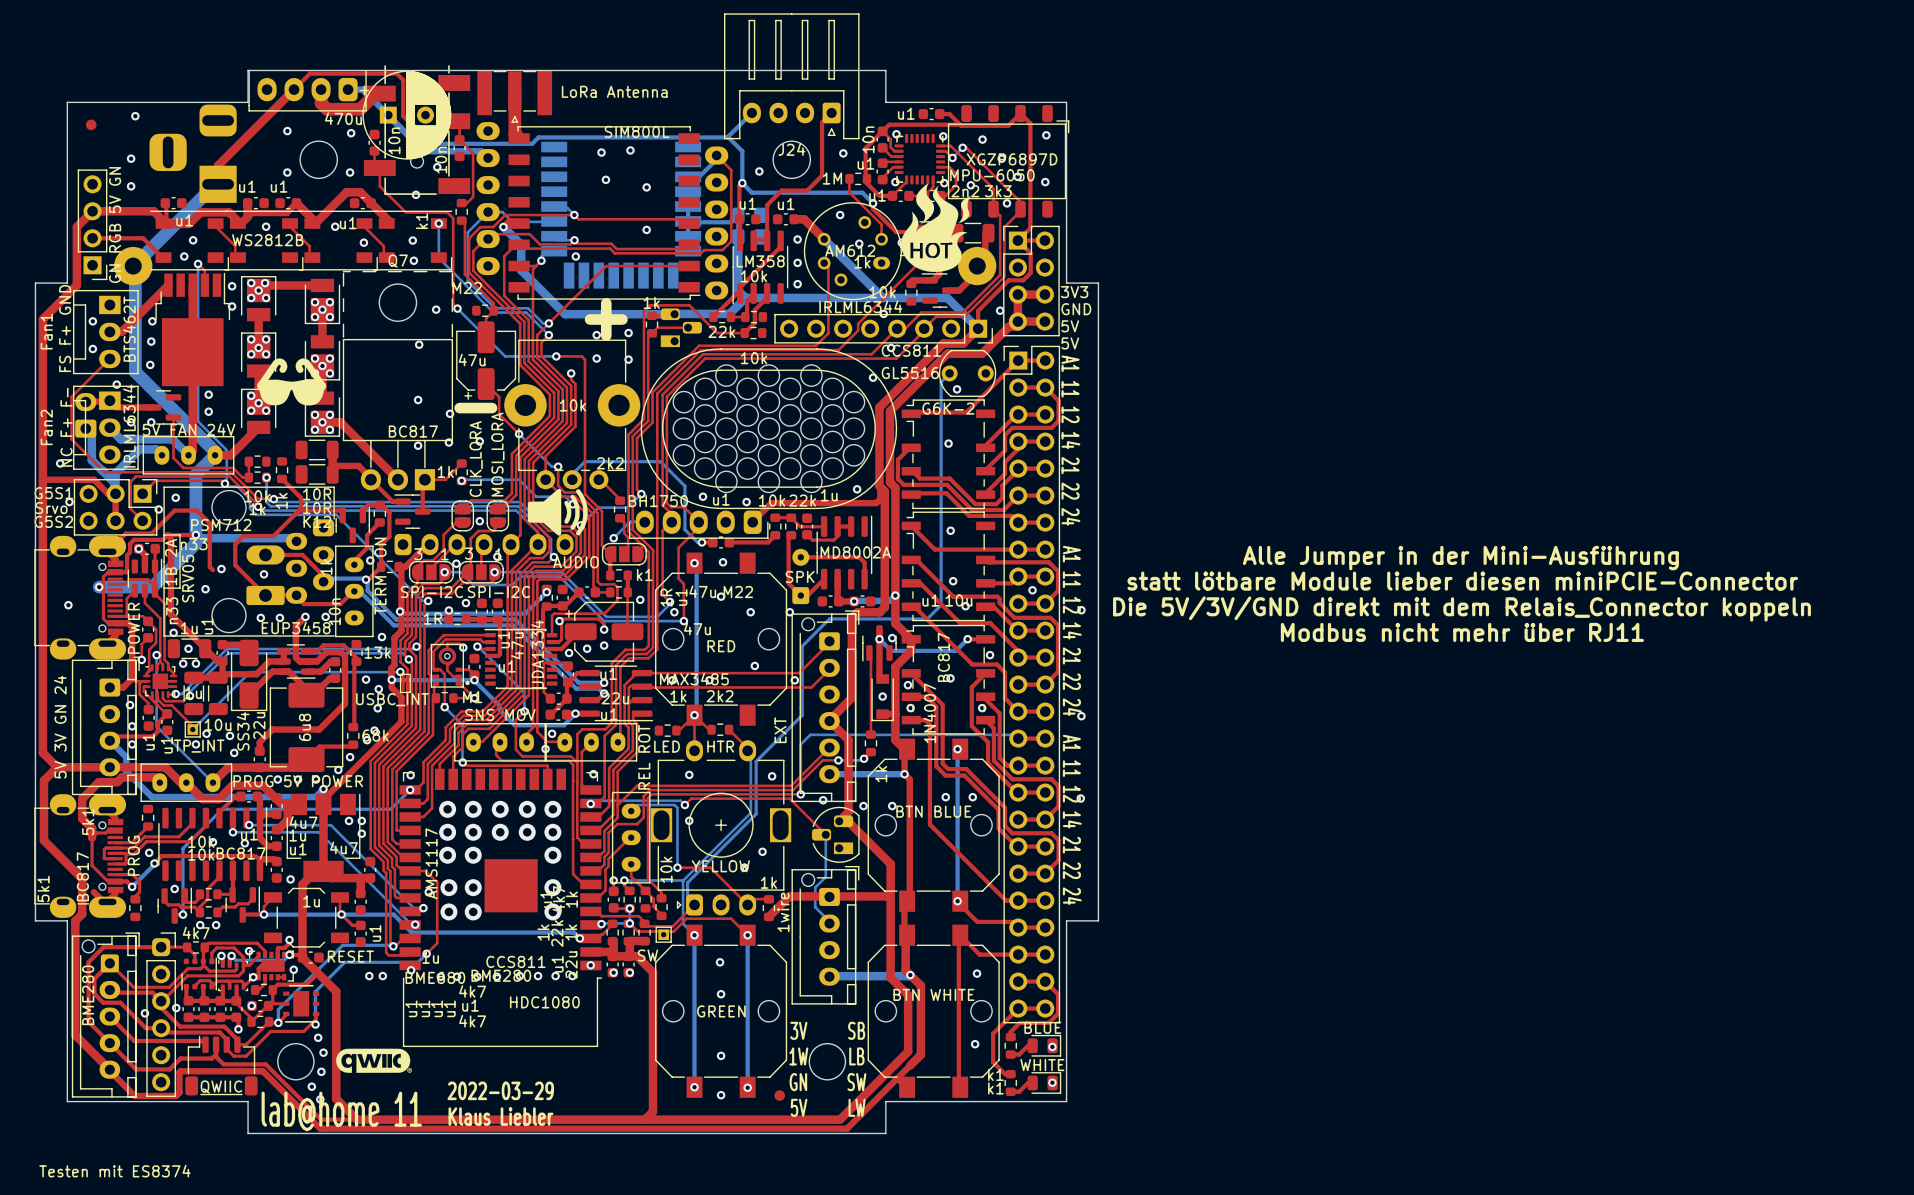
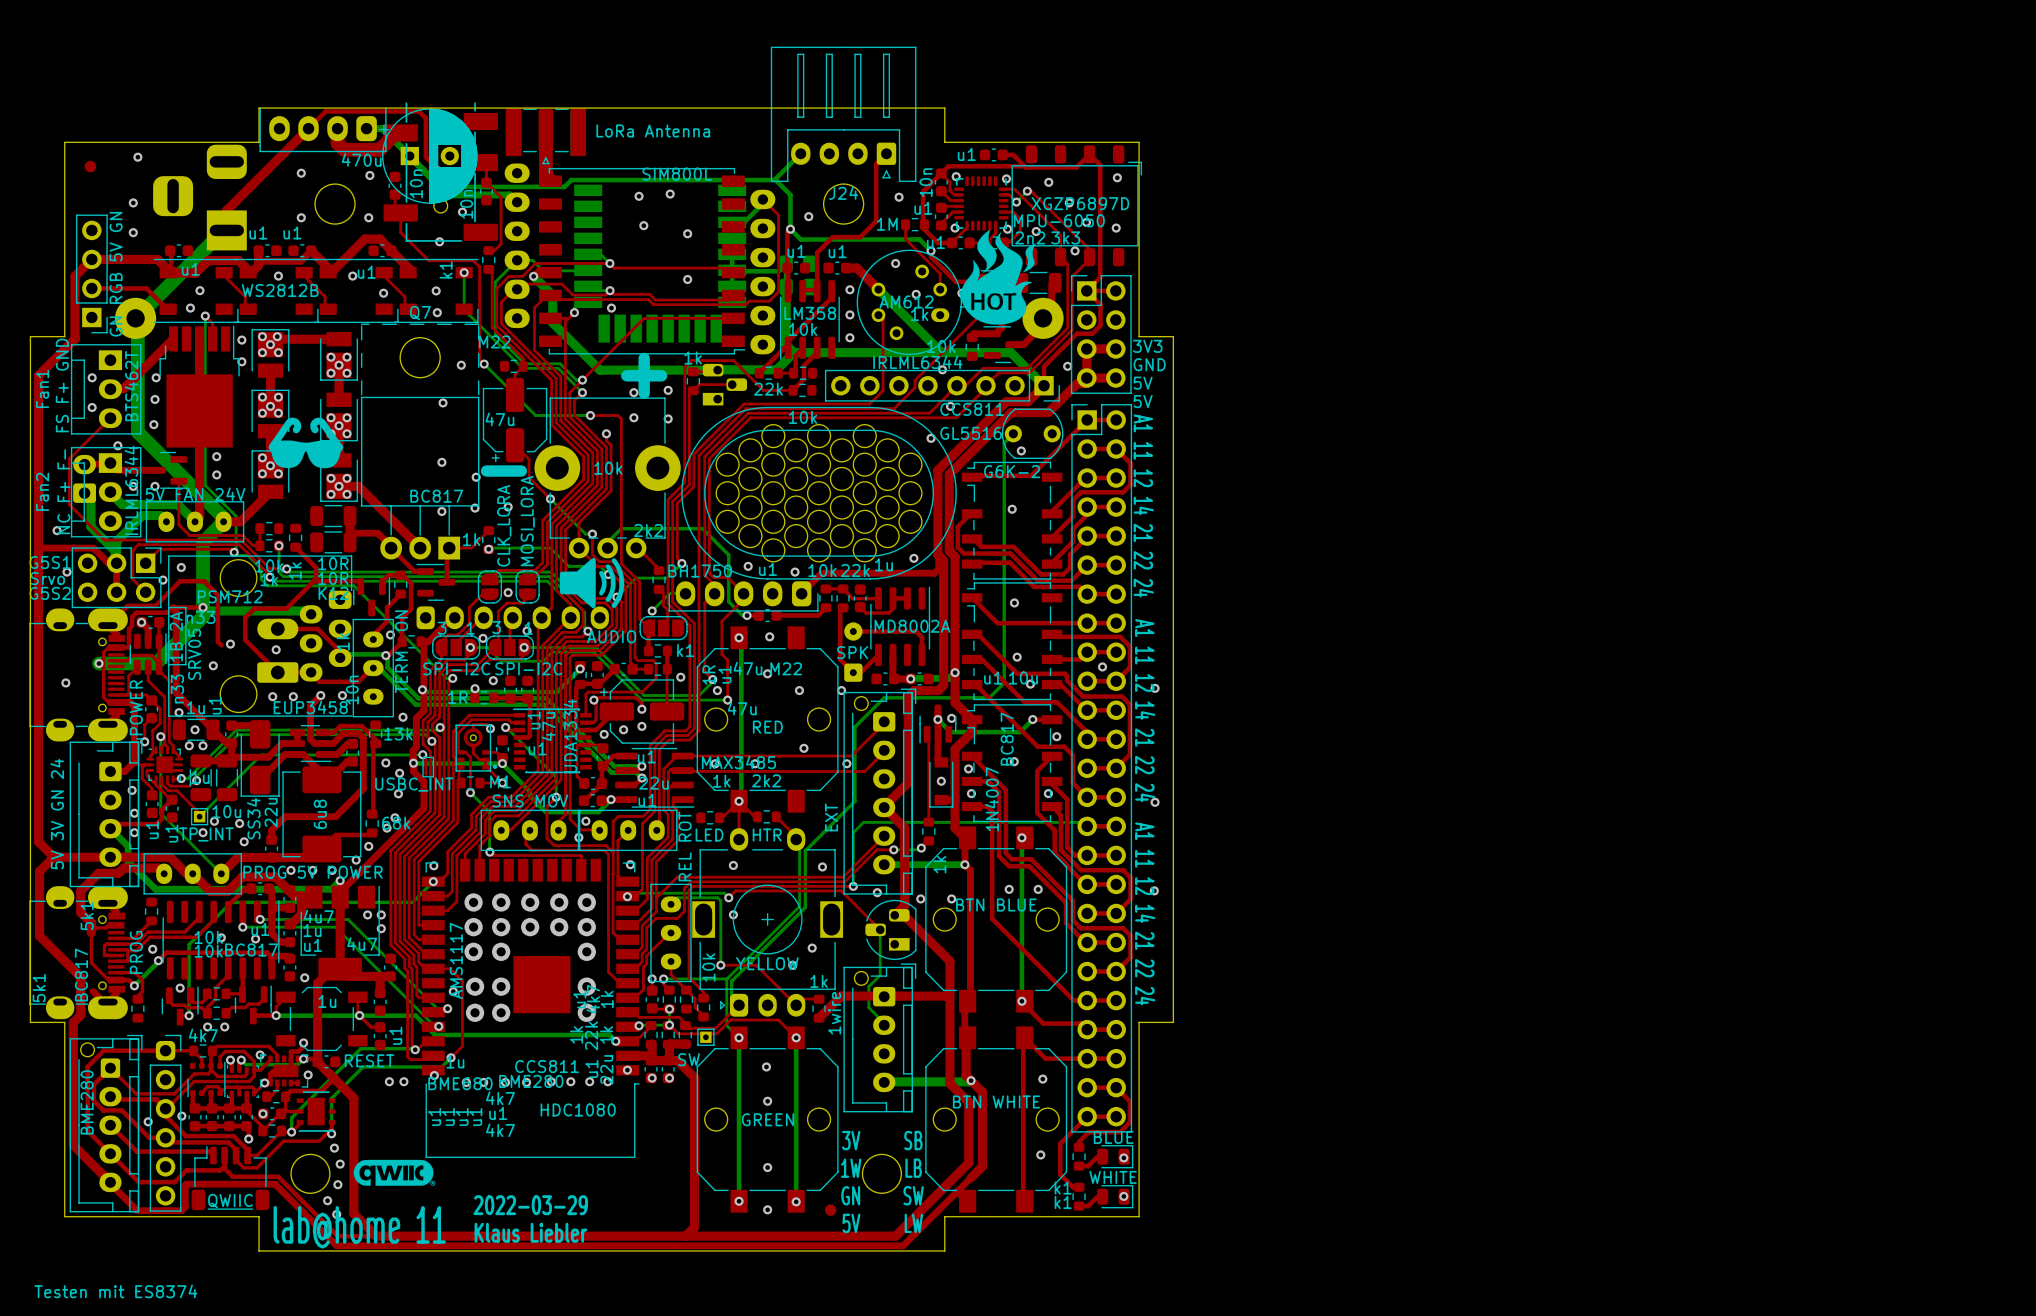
text: Alle Jumper in der Mini-Ausführung (1460, 558) -> none
text: statt lötbare Module lieber diesen miniPCIE-Connector (1462, 581) -> none
text: Die 5V/3V/GND direkt mit dem Relais_Connector koppeln (1461, 609) -> none
text: Modbus nicht mehr über RJ11 (1462, 632) -> none

